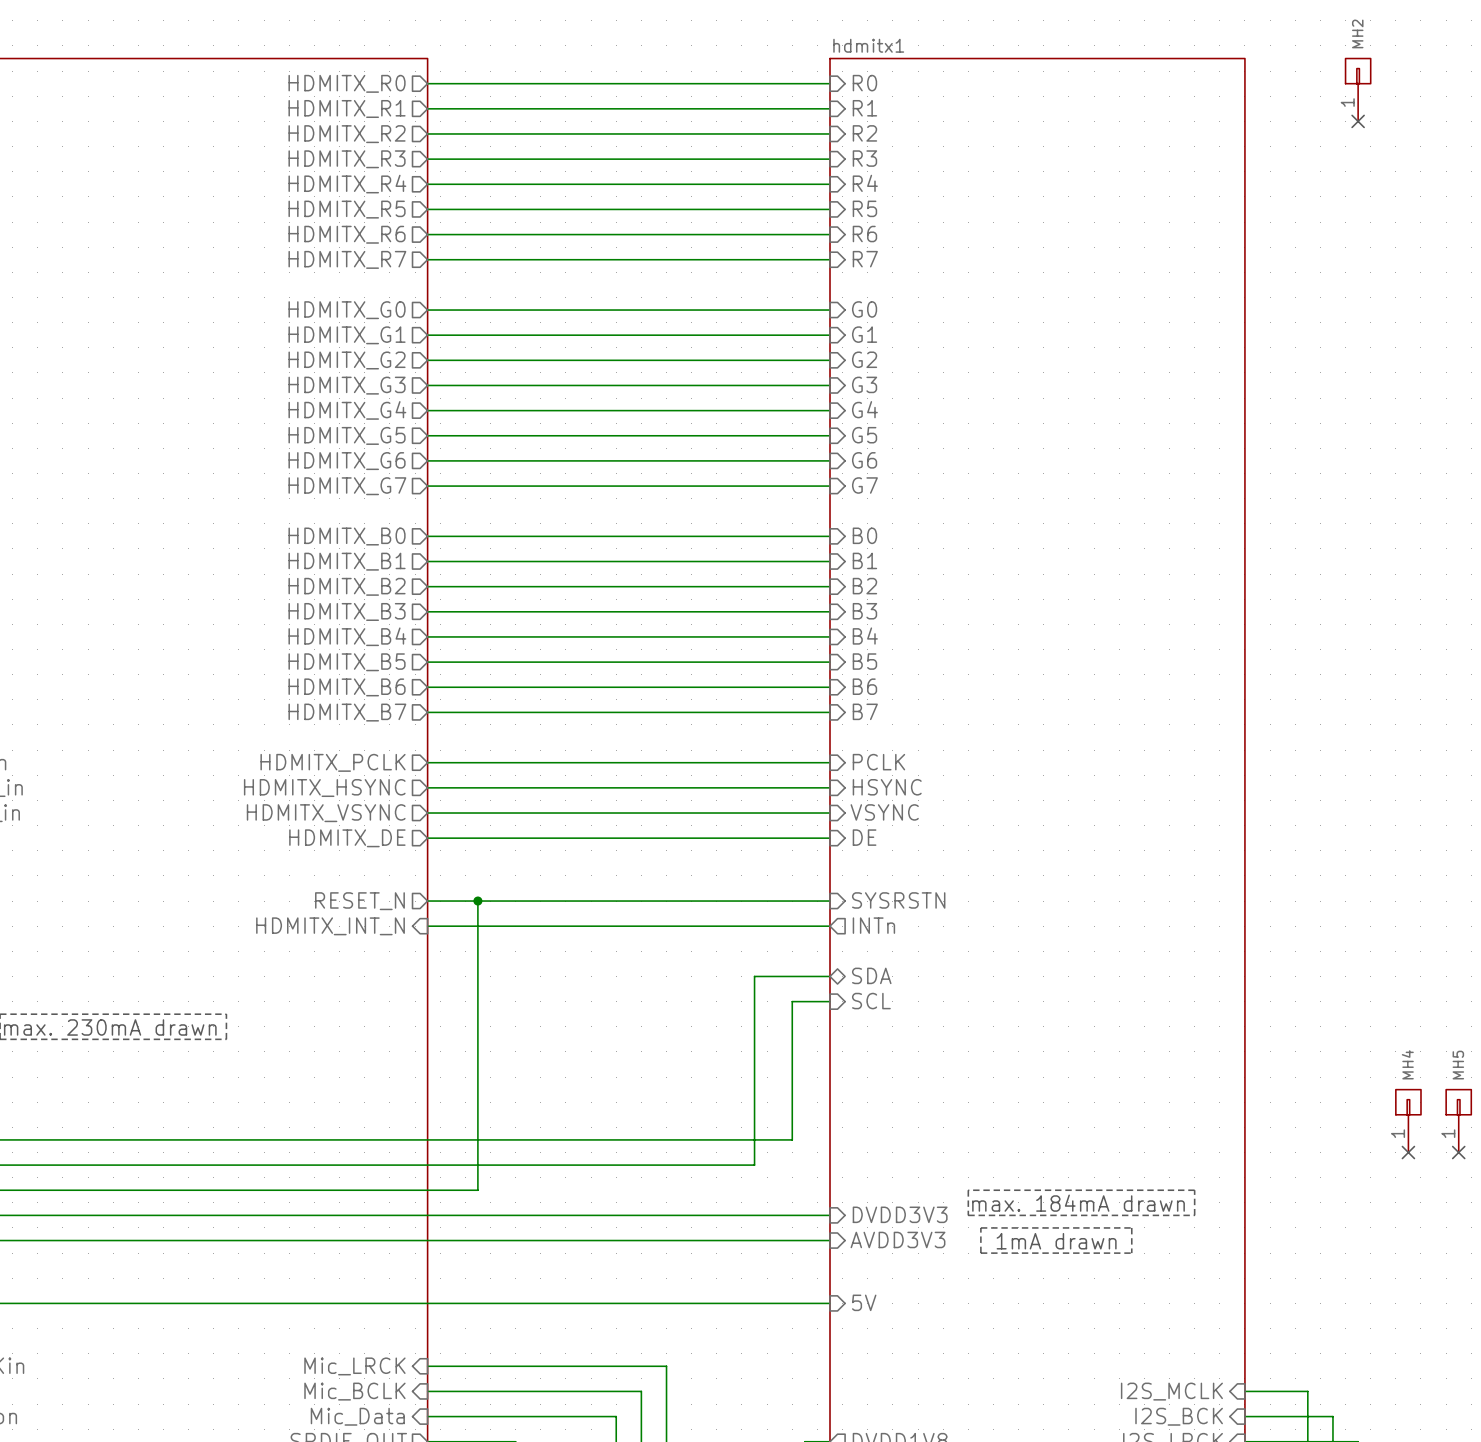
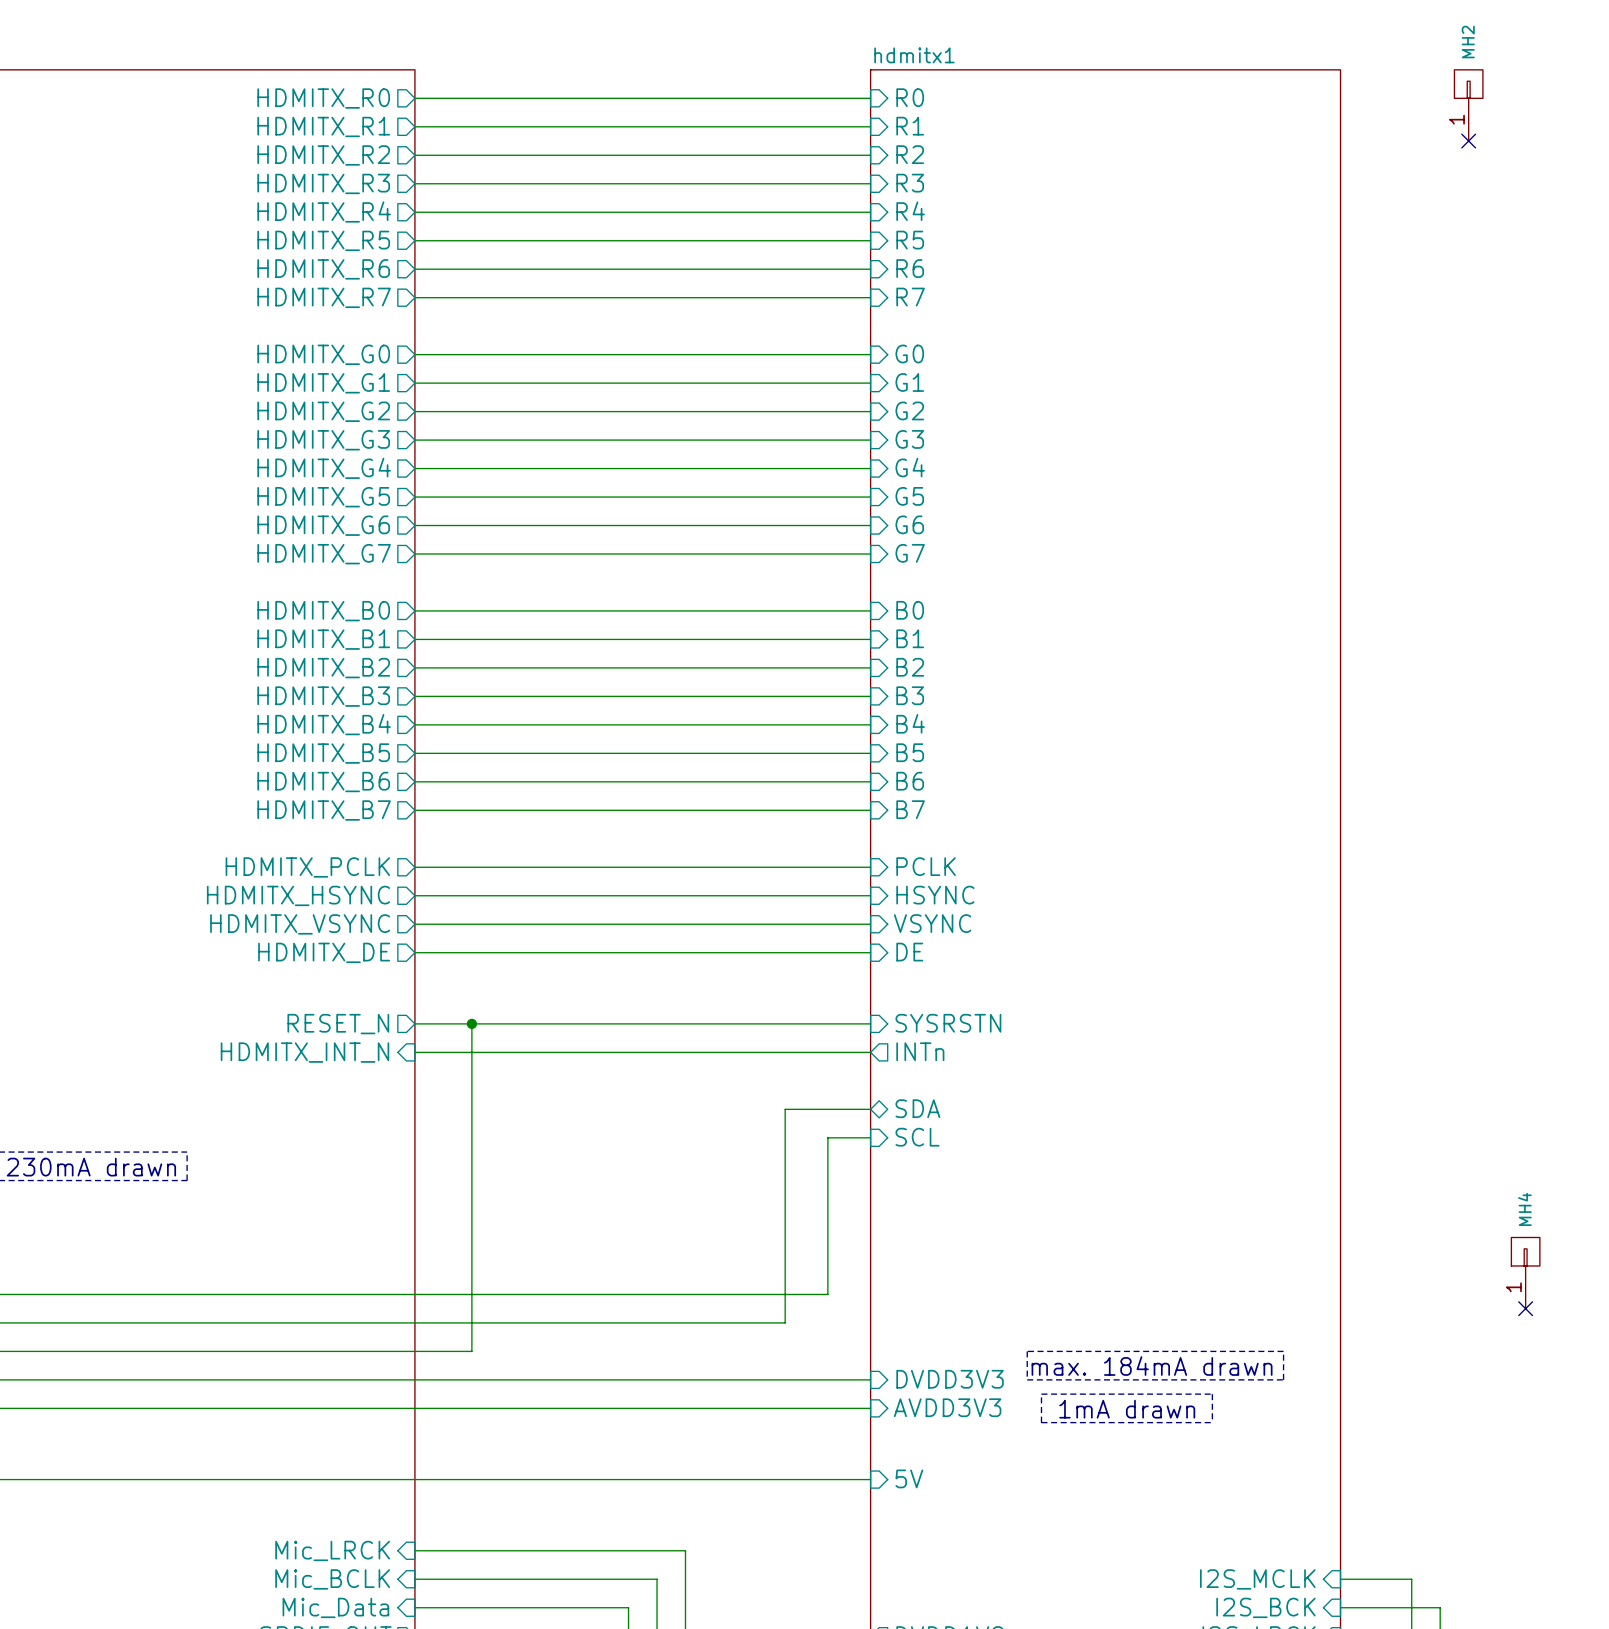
MH5: (1458, 1121) -> none
no-connect mark: (1458, 1152) -> none

